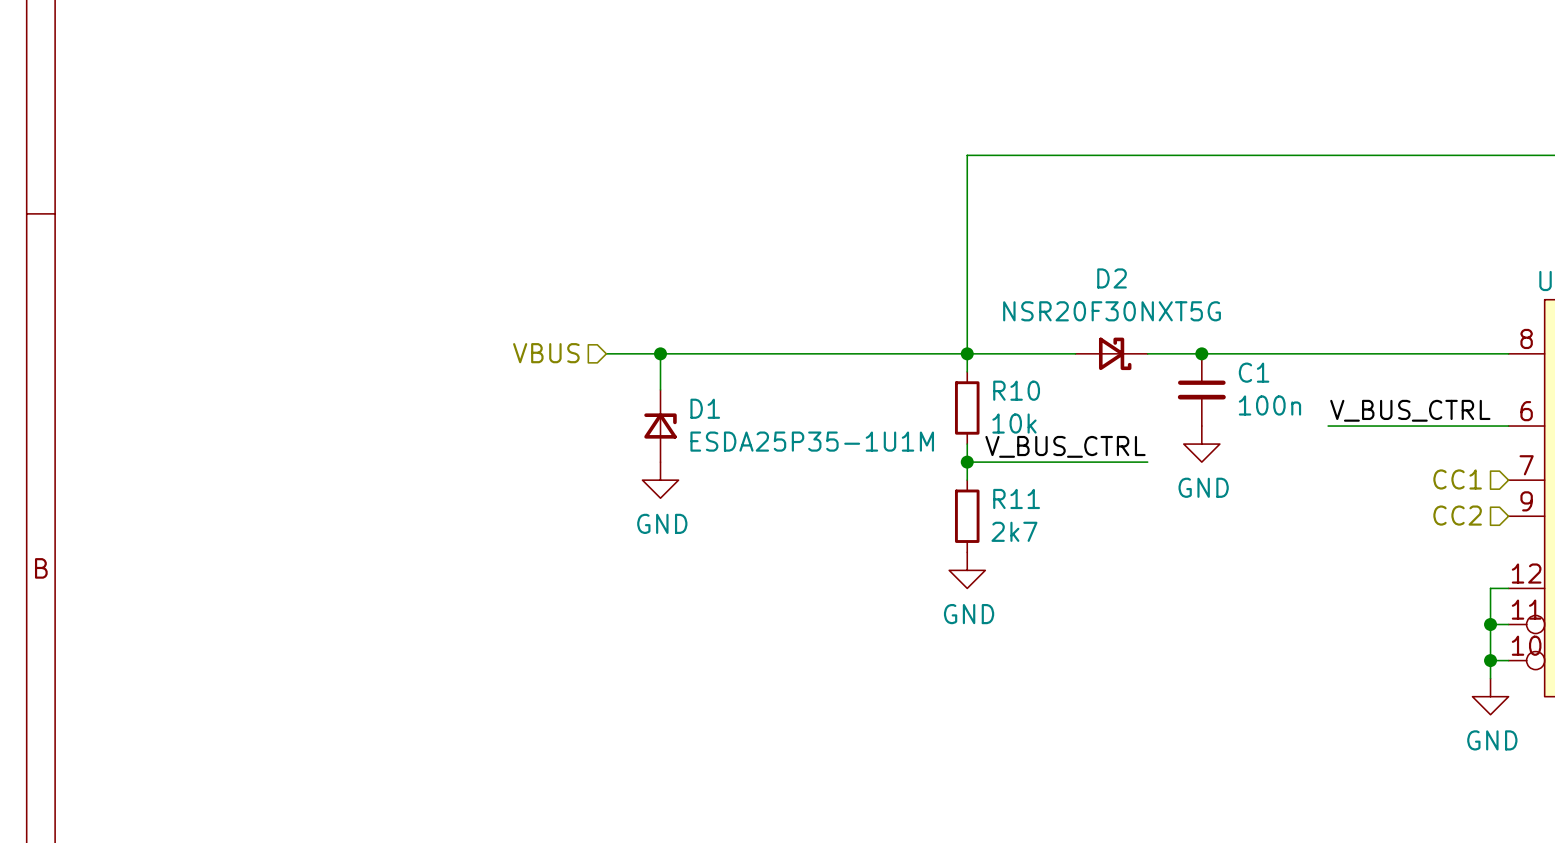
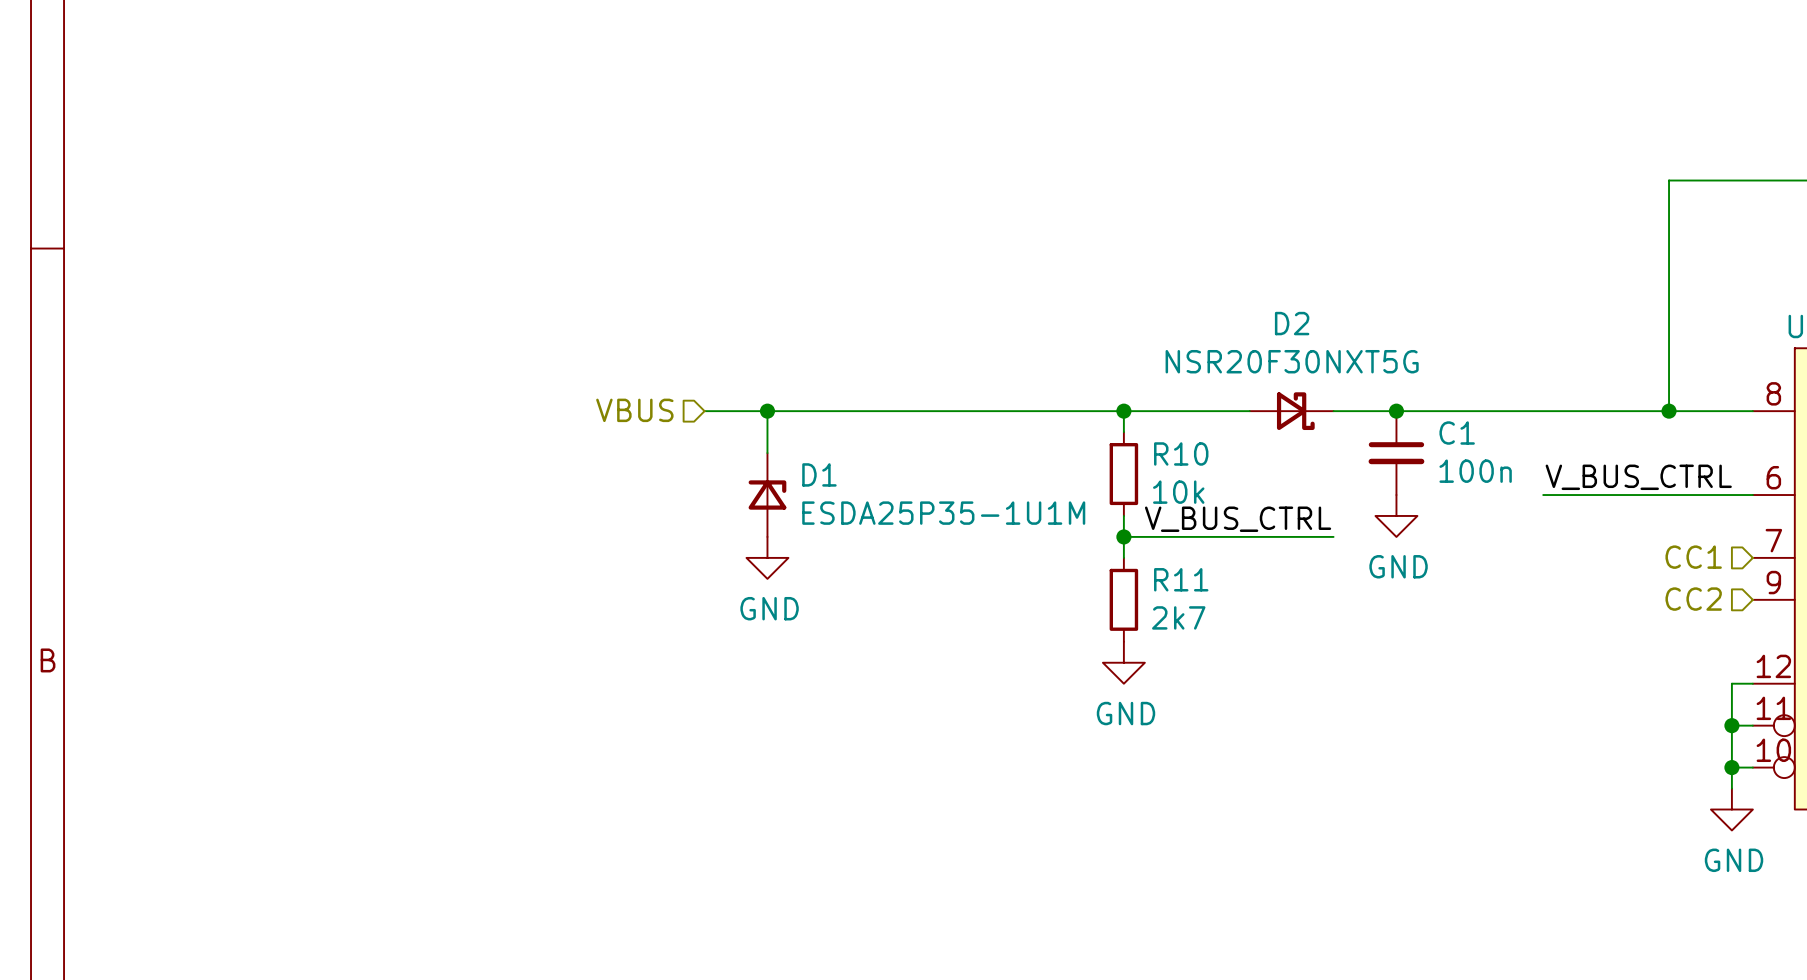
wire: (1436, 155) (967, 155) (967, 353) -> (1669, 180) (1669, 411)
junction: none -> (1669, 411)

